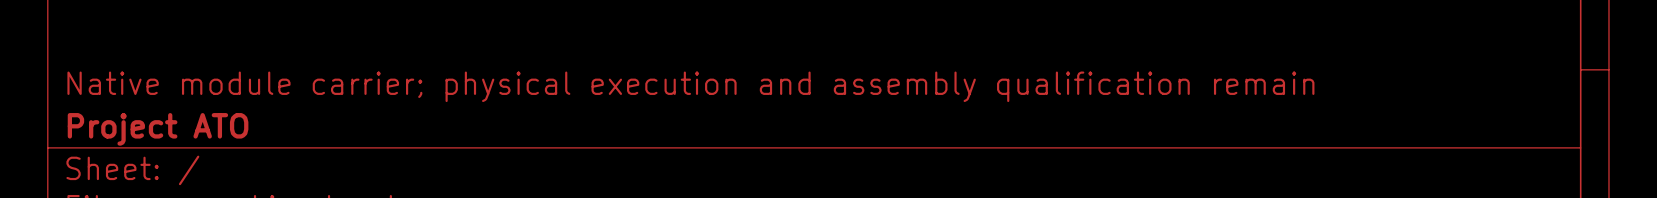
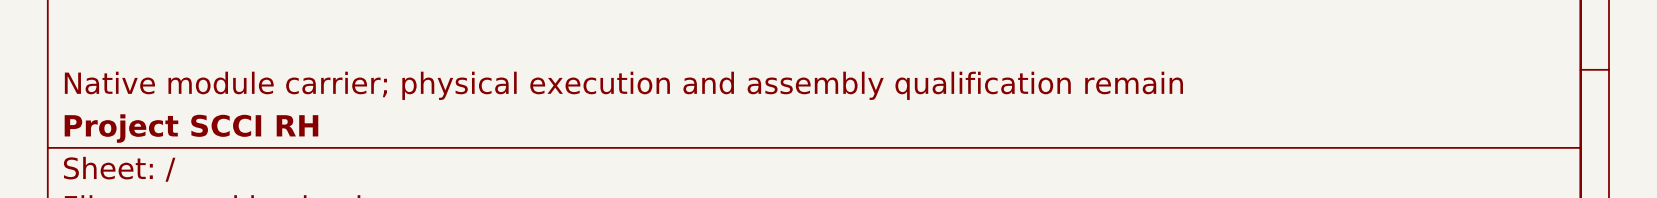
title block: Project ATO (158, 129) -> Project SCCI RH (191, 128)

